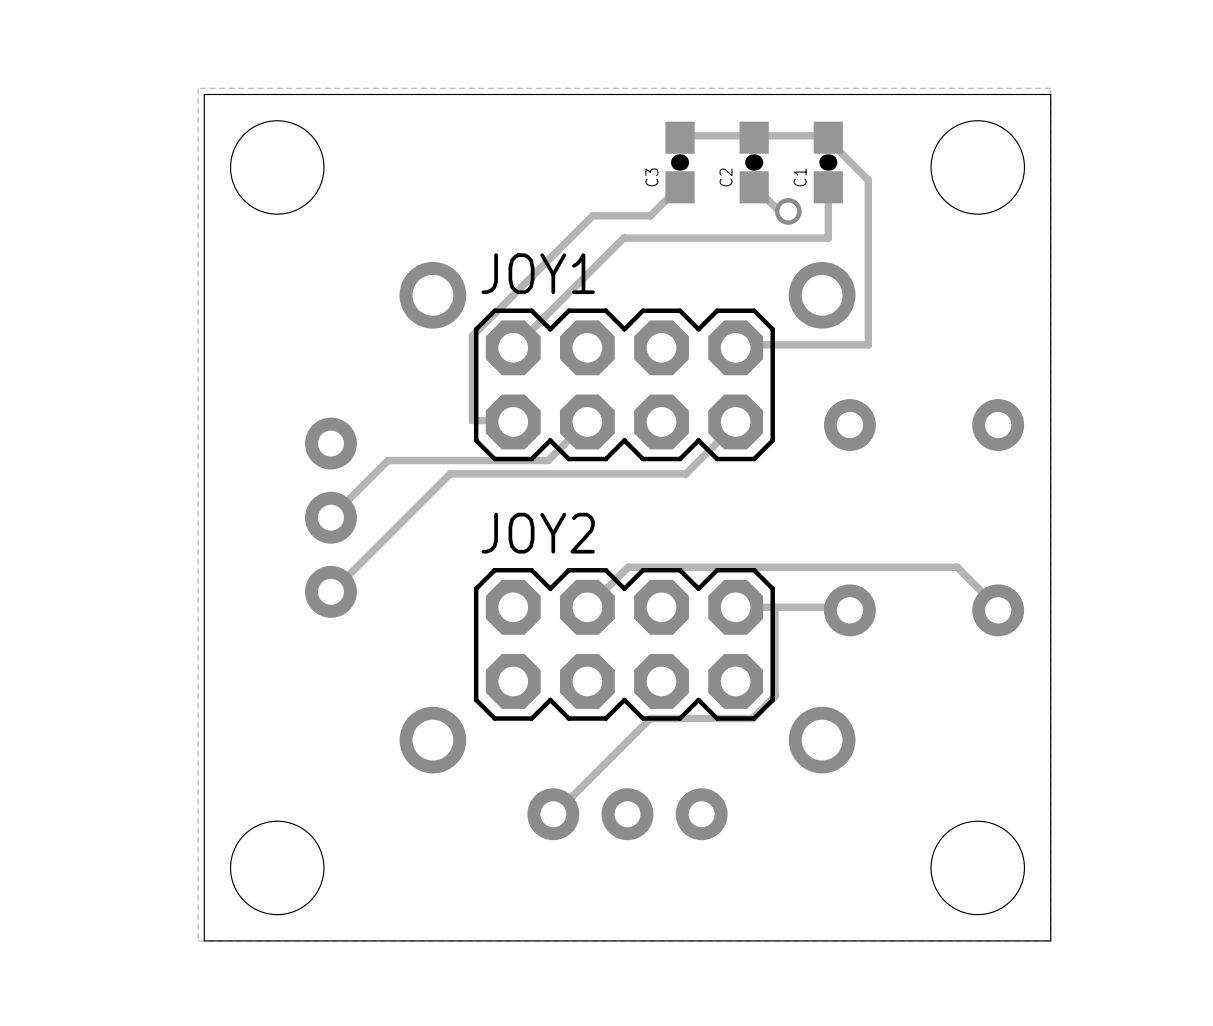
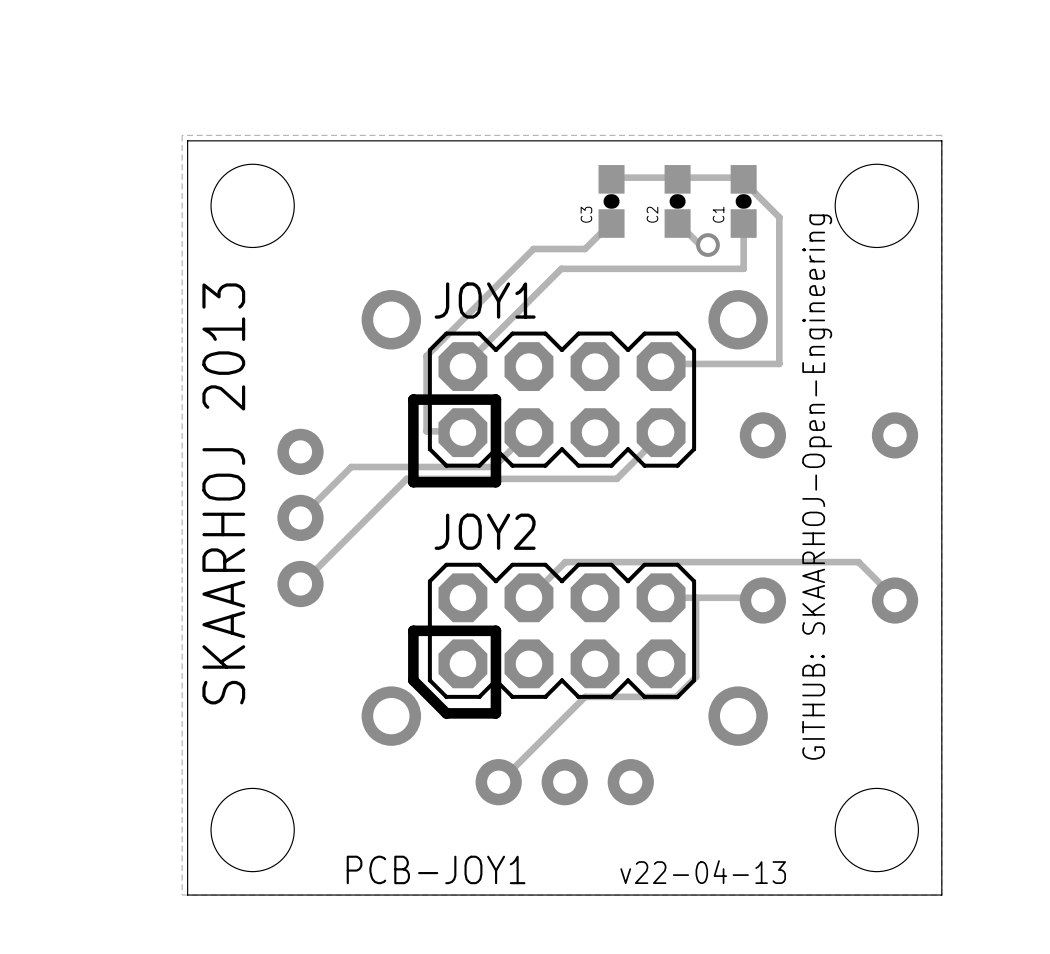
line: none -> (495, 399) (495, 482) (413, 482) (413, 399) (495, 399)
text: none -> GITHUB: SKAARHOJ-Open-Engineering (817, 487)
text: none -> SKAARHOJ 2013 (223, 493)
line: none -> (495, 630) (495, 713) (446, 713) (413, 680) (413, 630) (495, 630)
text: none -> PCB-JOY1 (436, 869)
text: none -> v22-04-13 (703, 872)

